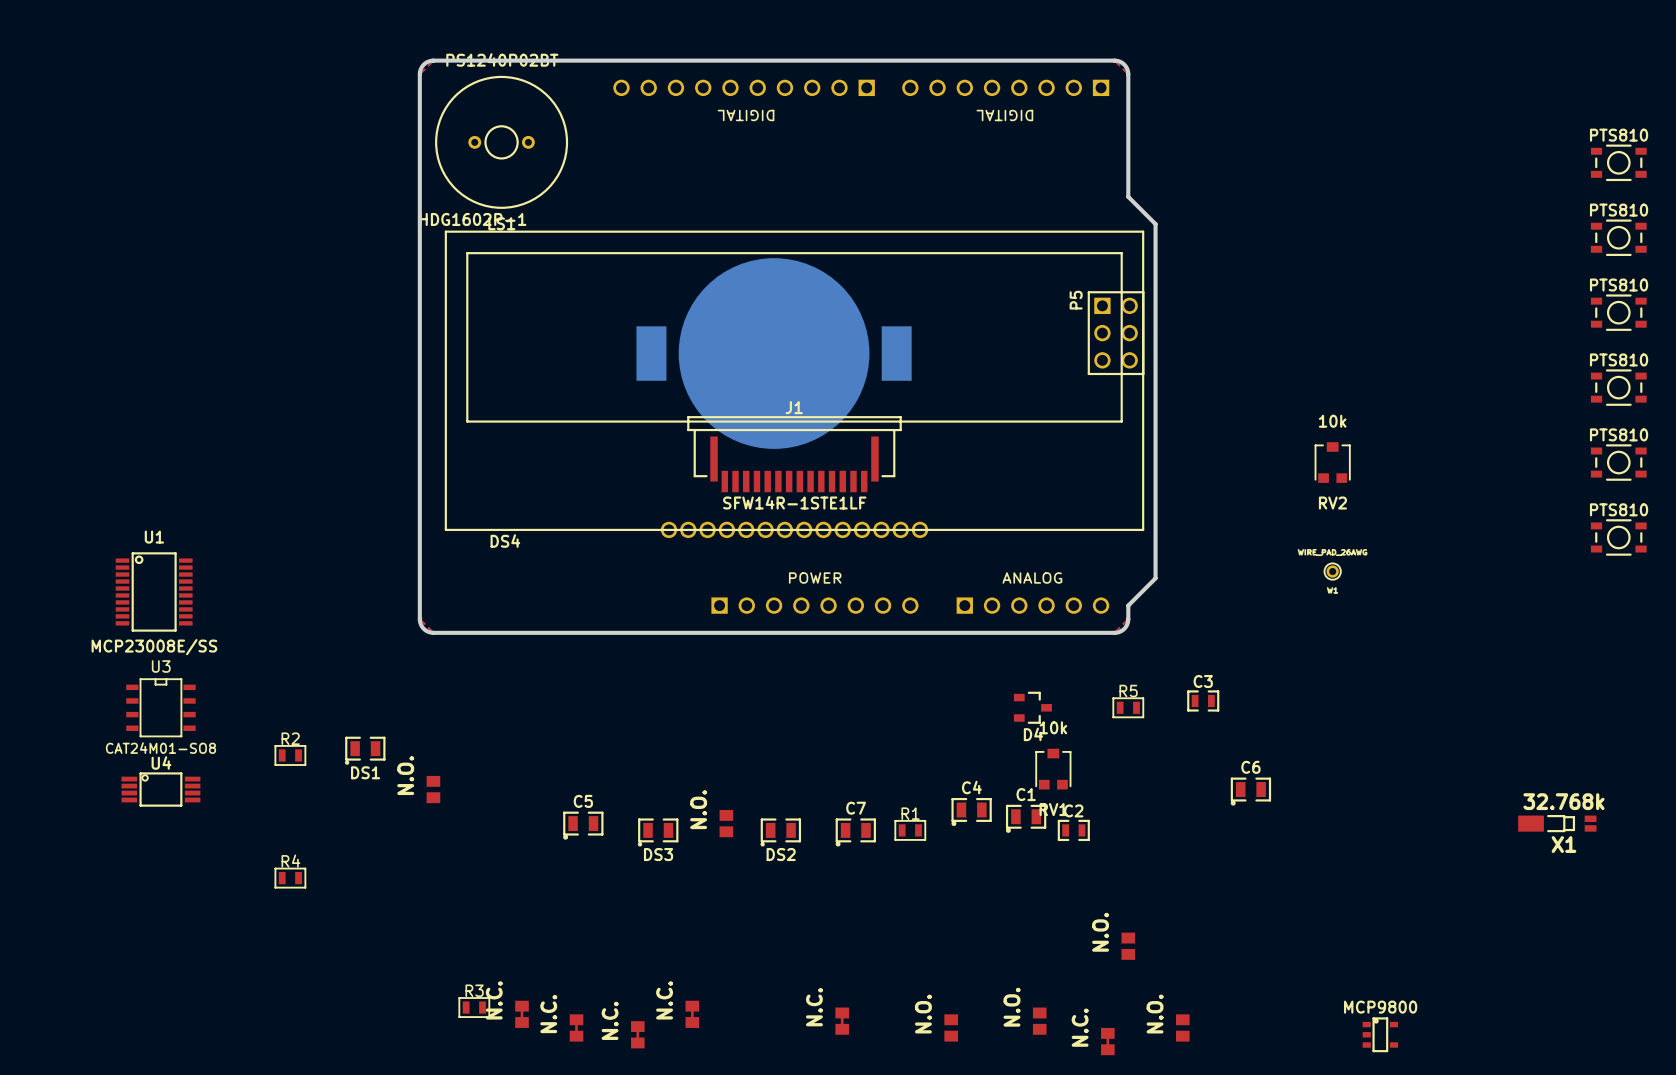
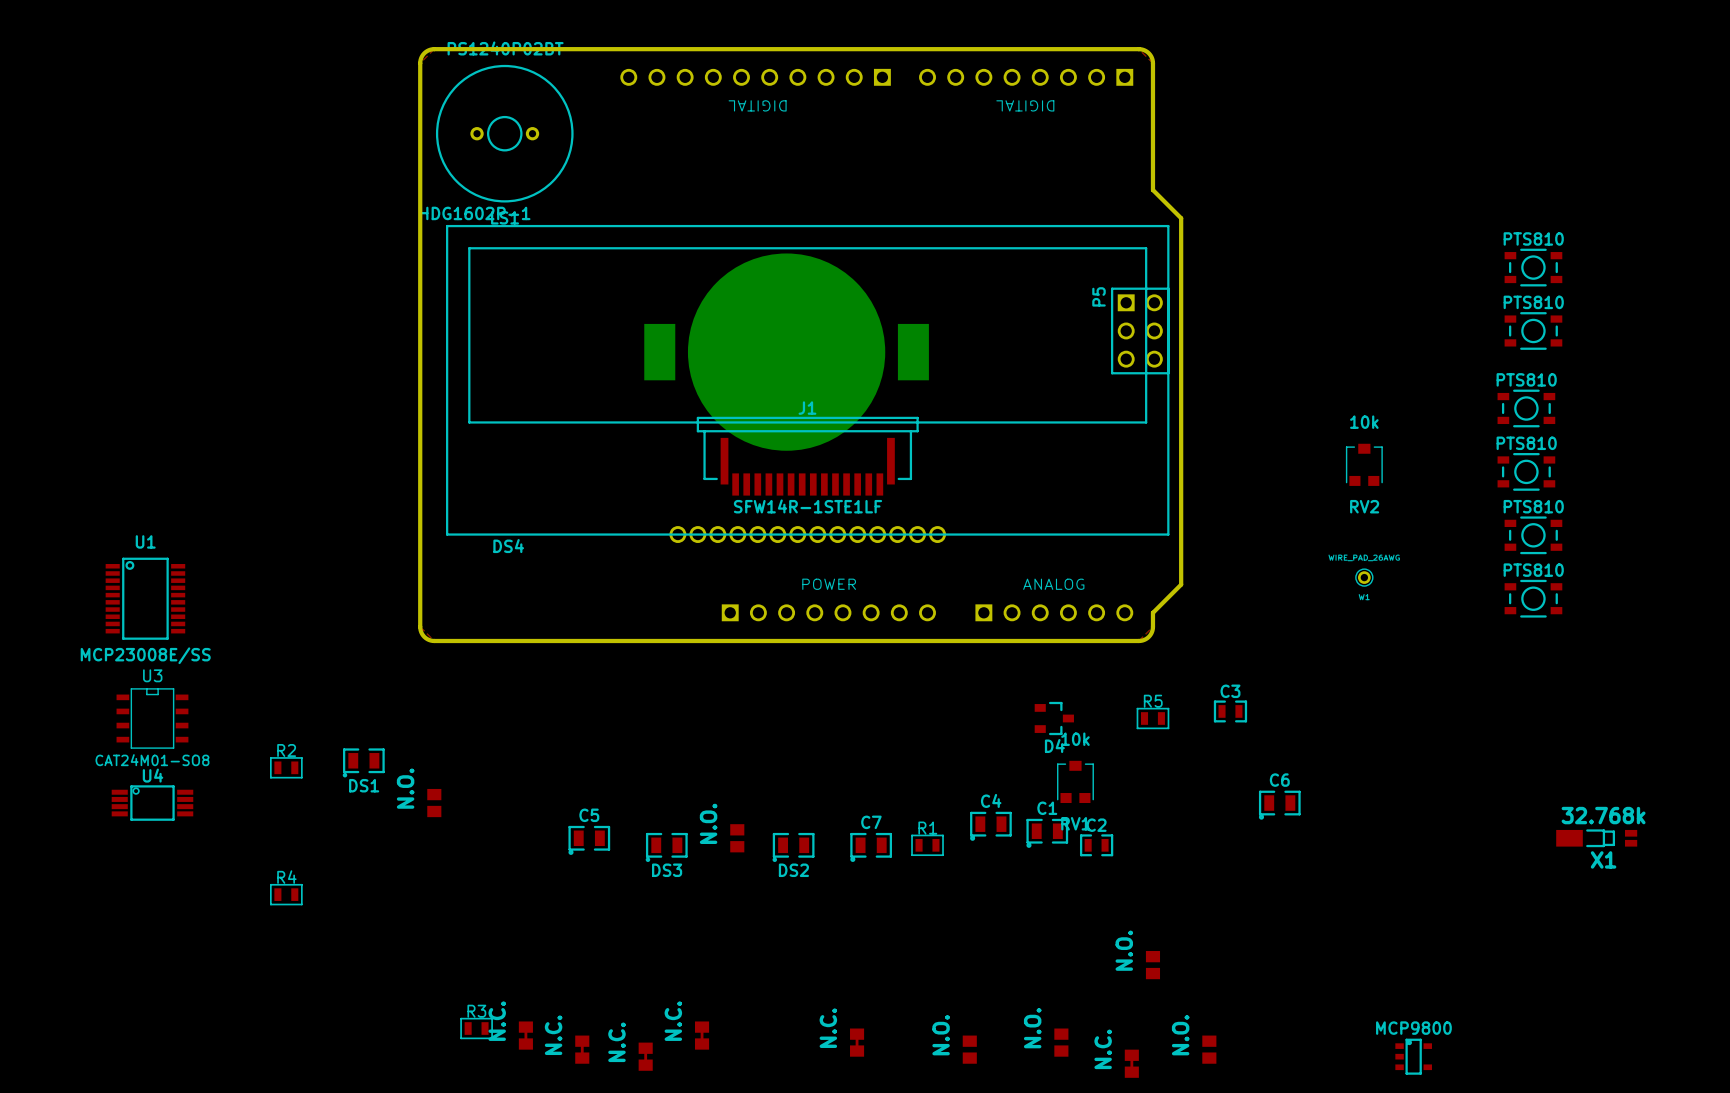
part: PTS810 (1618, 162) -> none
part: PTS810 (1618, 237) -> none
part: none -> PTS810 (1533, 267)
part: PTS810 (1618, 312) -> none
part: none -> PTS810 (1533, 330)
part: PTS810 (1618, 387) -> none
part: none -> PTS810 (1526, 408)
part: PTS810 (1618, 462) -> none
part: none -> PTS810 (1526, 471)
part: none -> PTS810 (1533, 535)
part: PTS810 (1618, 537) -> none
part: none -> PTS810 (1533, 598)

